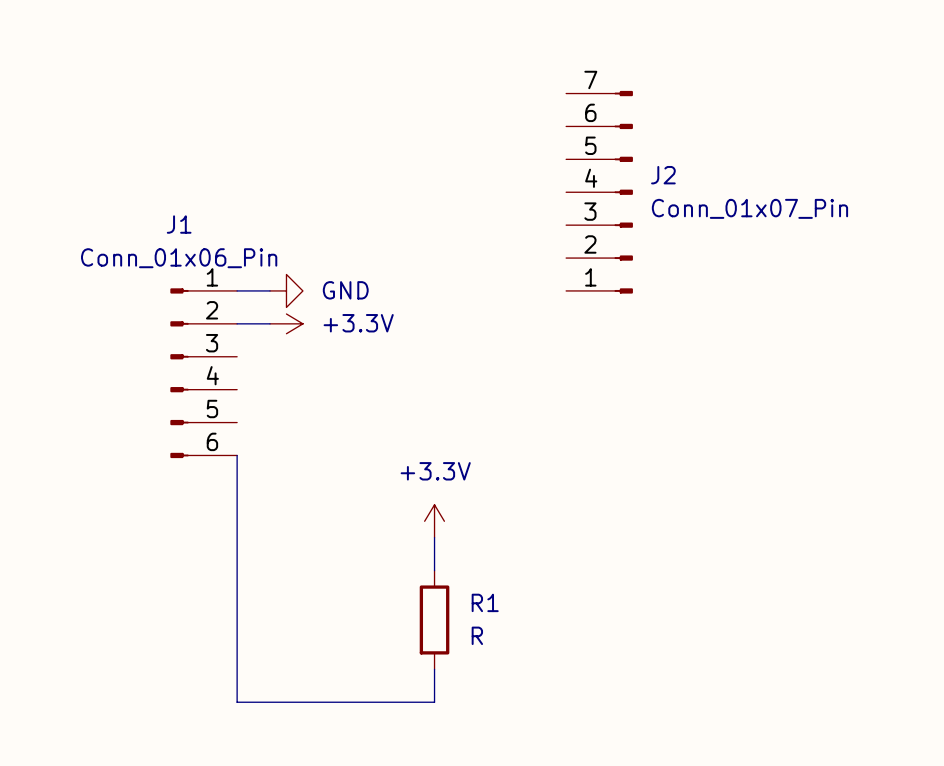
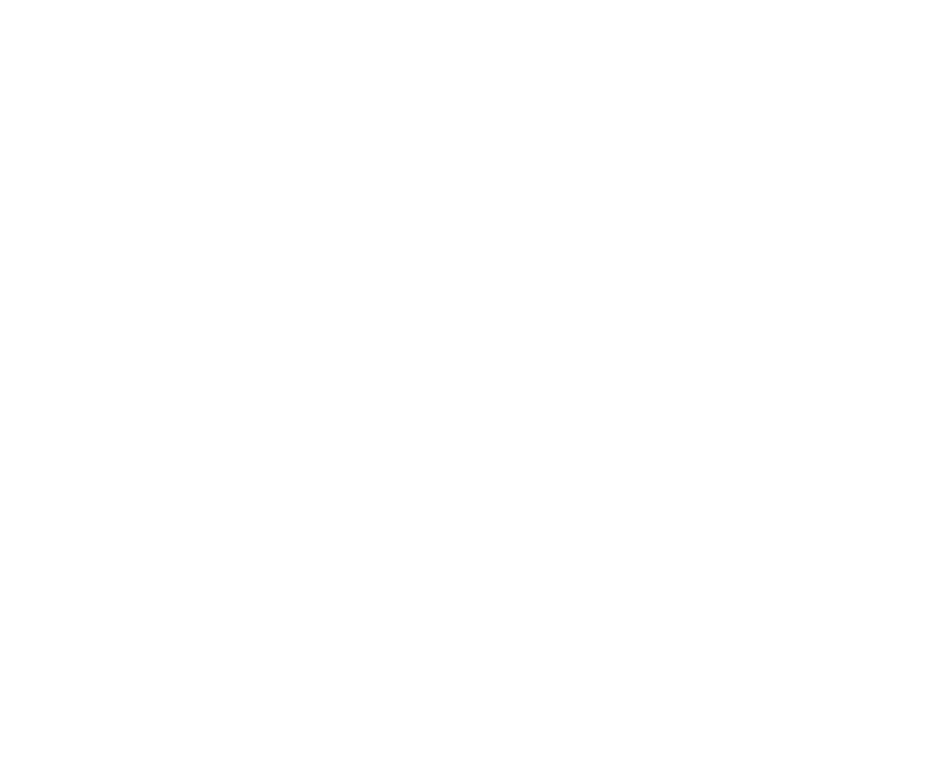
J2: Conn_01x07_Pin (599, 192) -> none
wire: (237, 290) (270, 290) -> none
power symbol: GND (286, 290) -> none
wire: (237, 323) (270, 323) -> none
power symbol: +3.3V (286, 323) -> none
J1: Conn_01x06_Pin (203, 373) -> none
wire: (237, 455) (237, 702) (434, 702) (434, 669) -> none
power symbol: +3.3V (434, 521) -> none
wire: (434, 537) (434, 570) -> none
R1: R (434, 619) -> none

